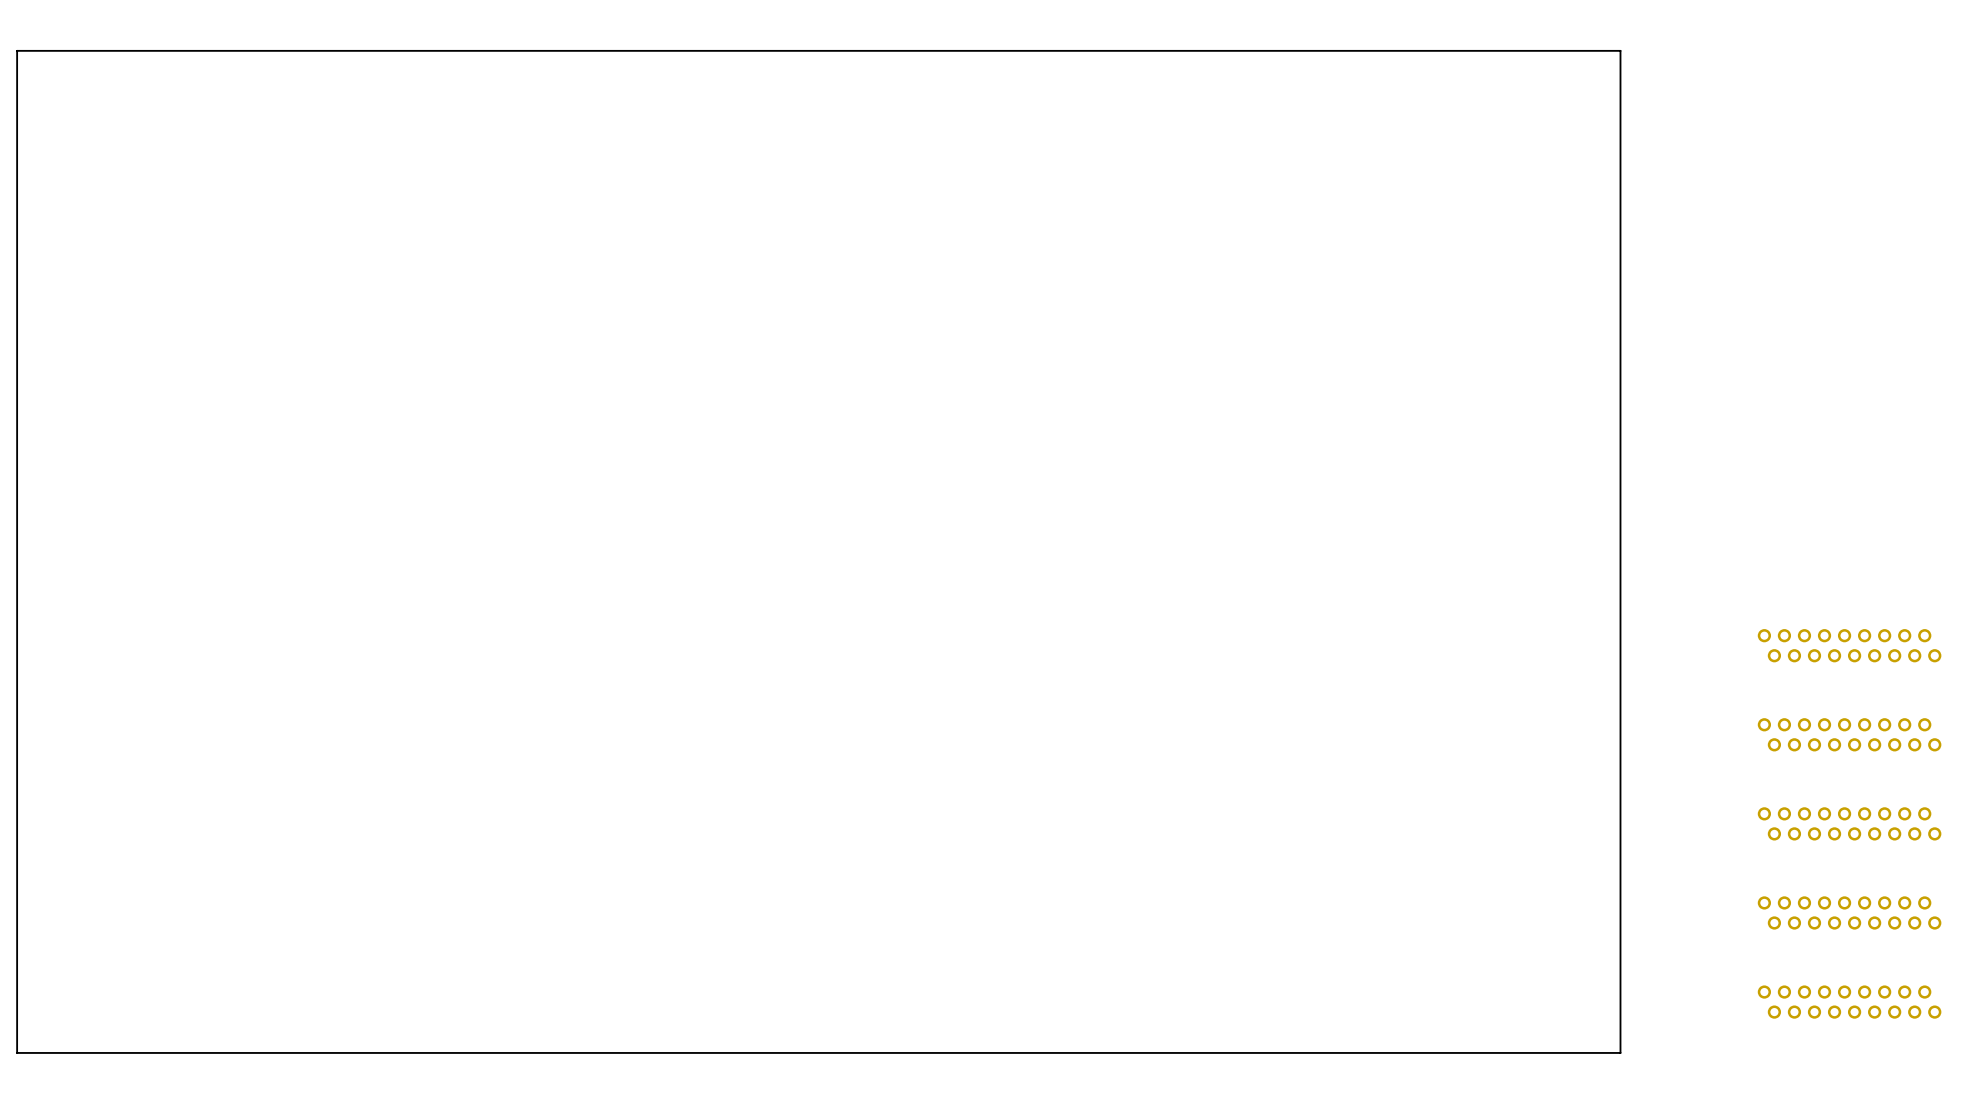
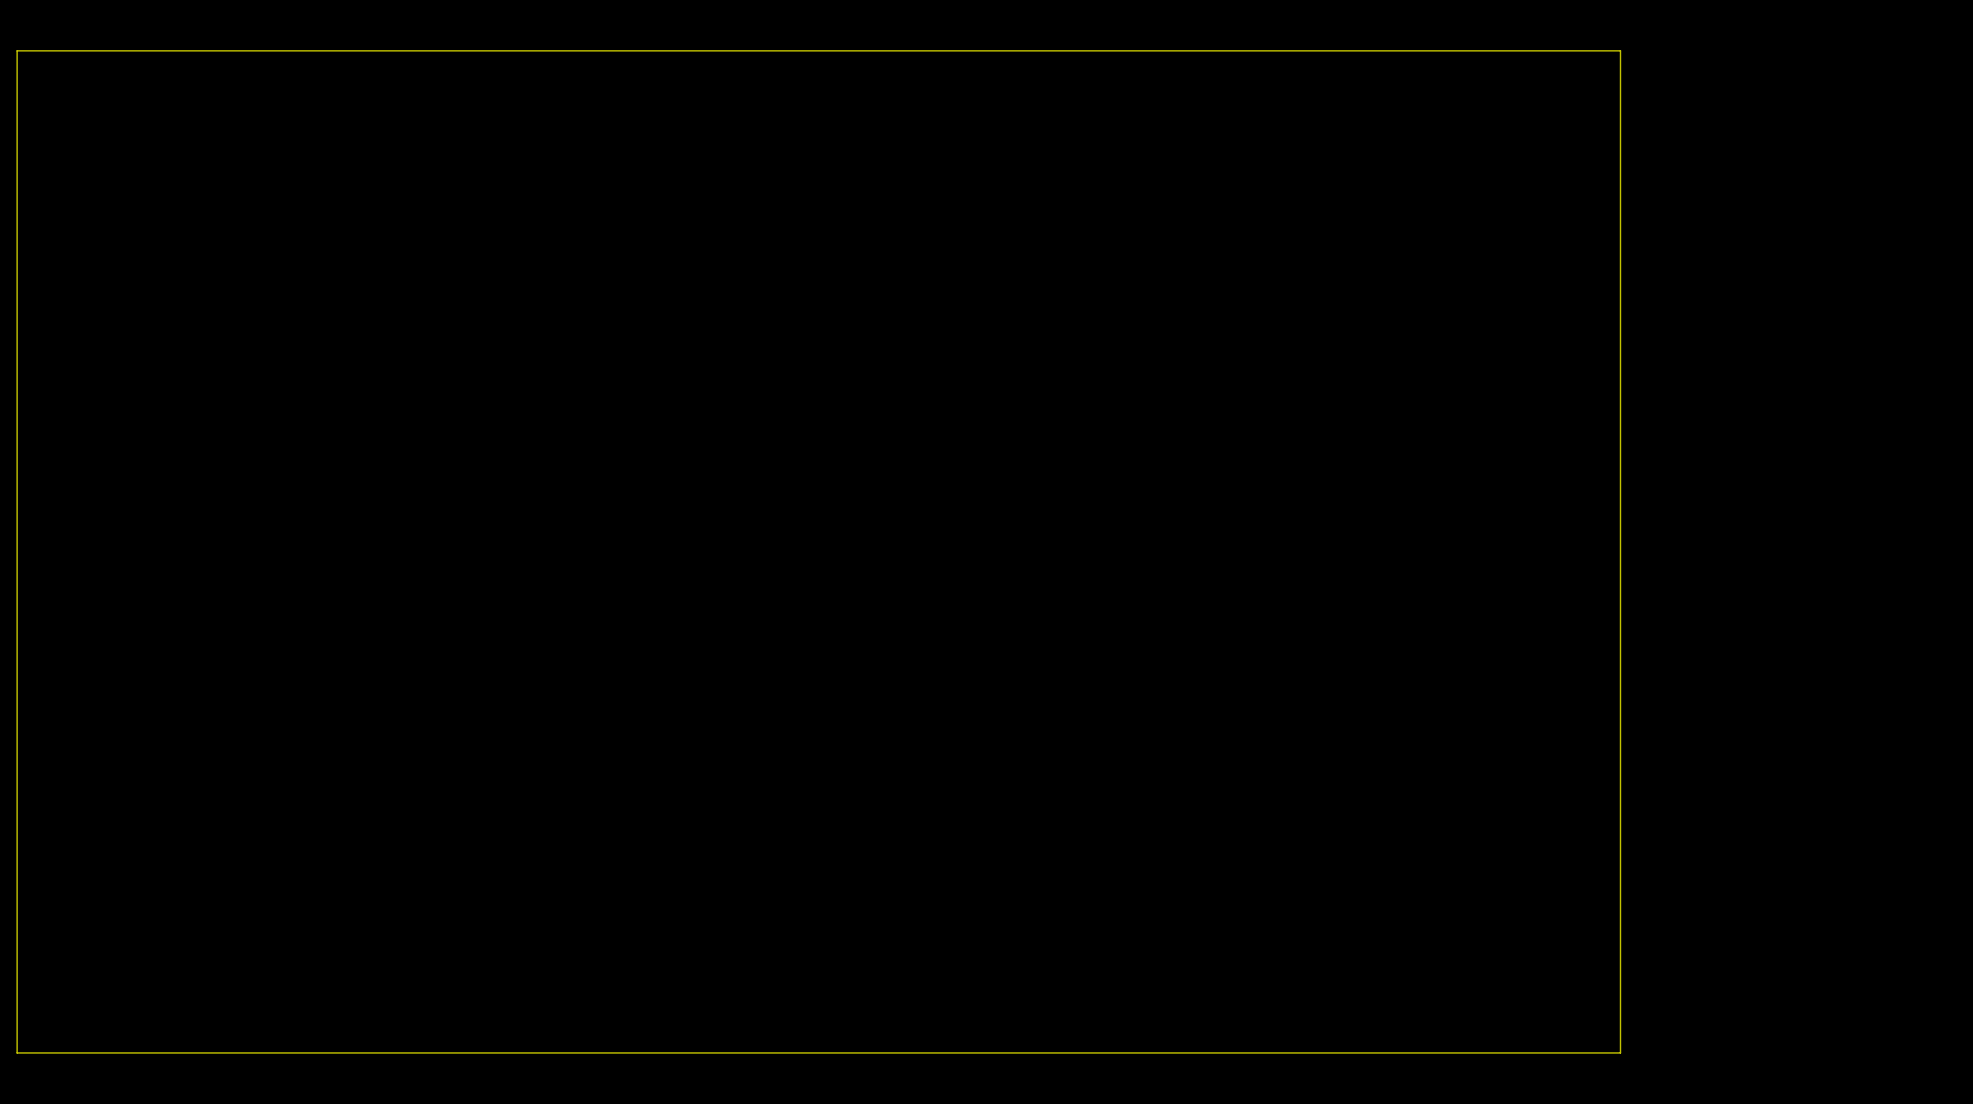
part: (1849, 645) -> none
part: (1849, 734) -> none
part: (1849, 823) -> none
part: (1849, 912) -> none
part: (1849, 1002) -> none

